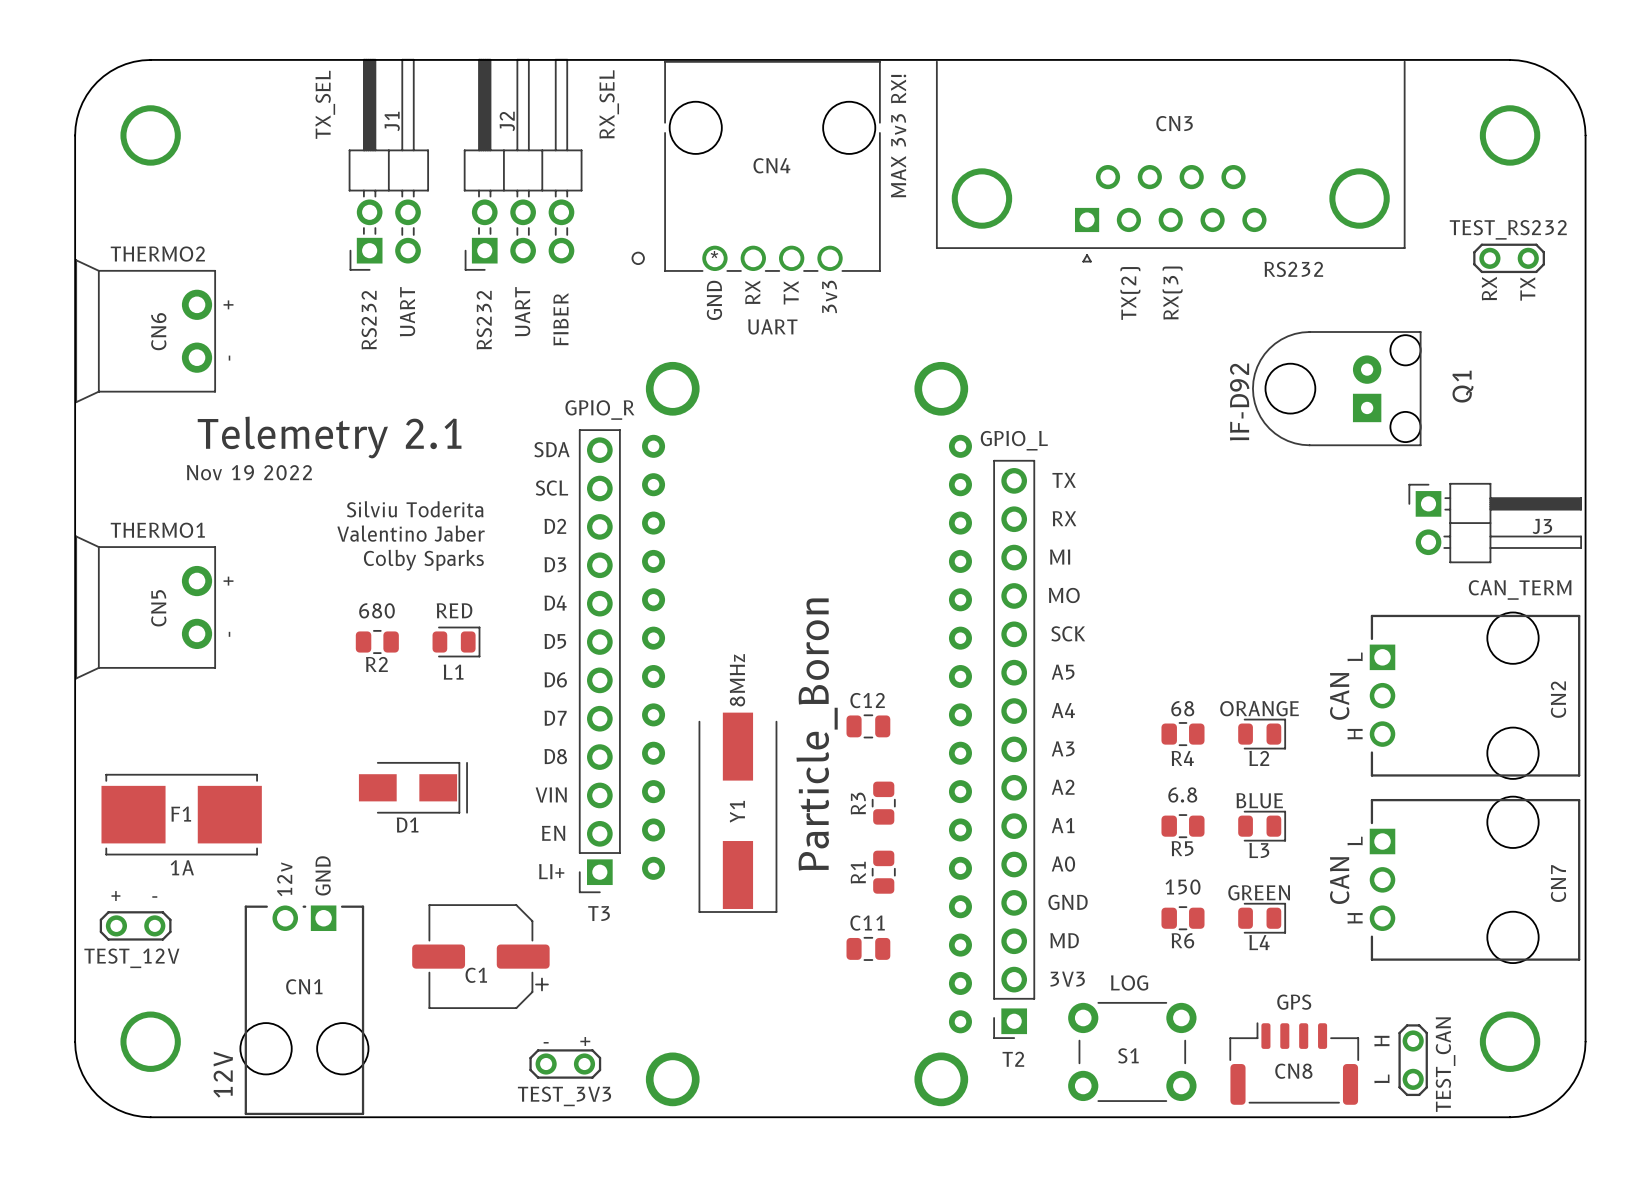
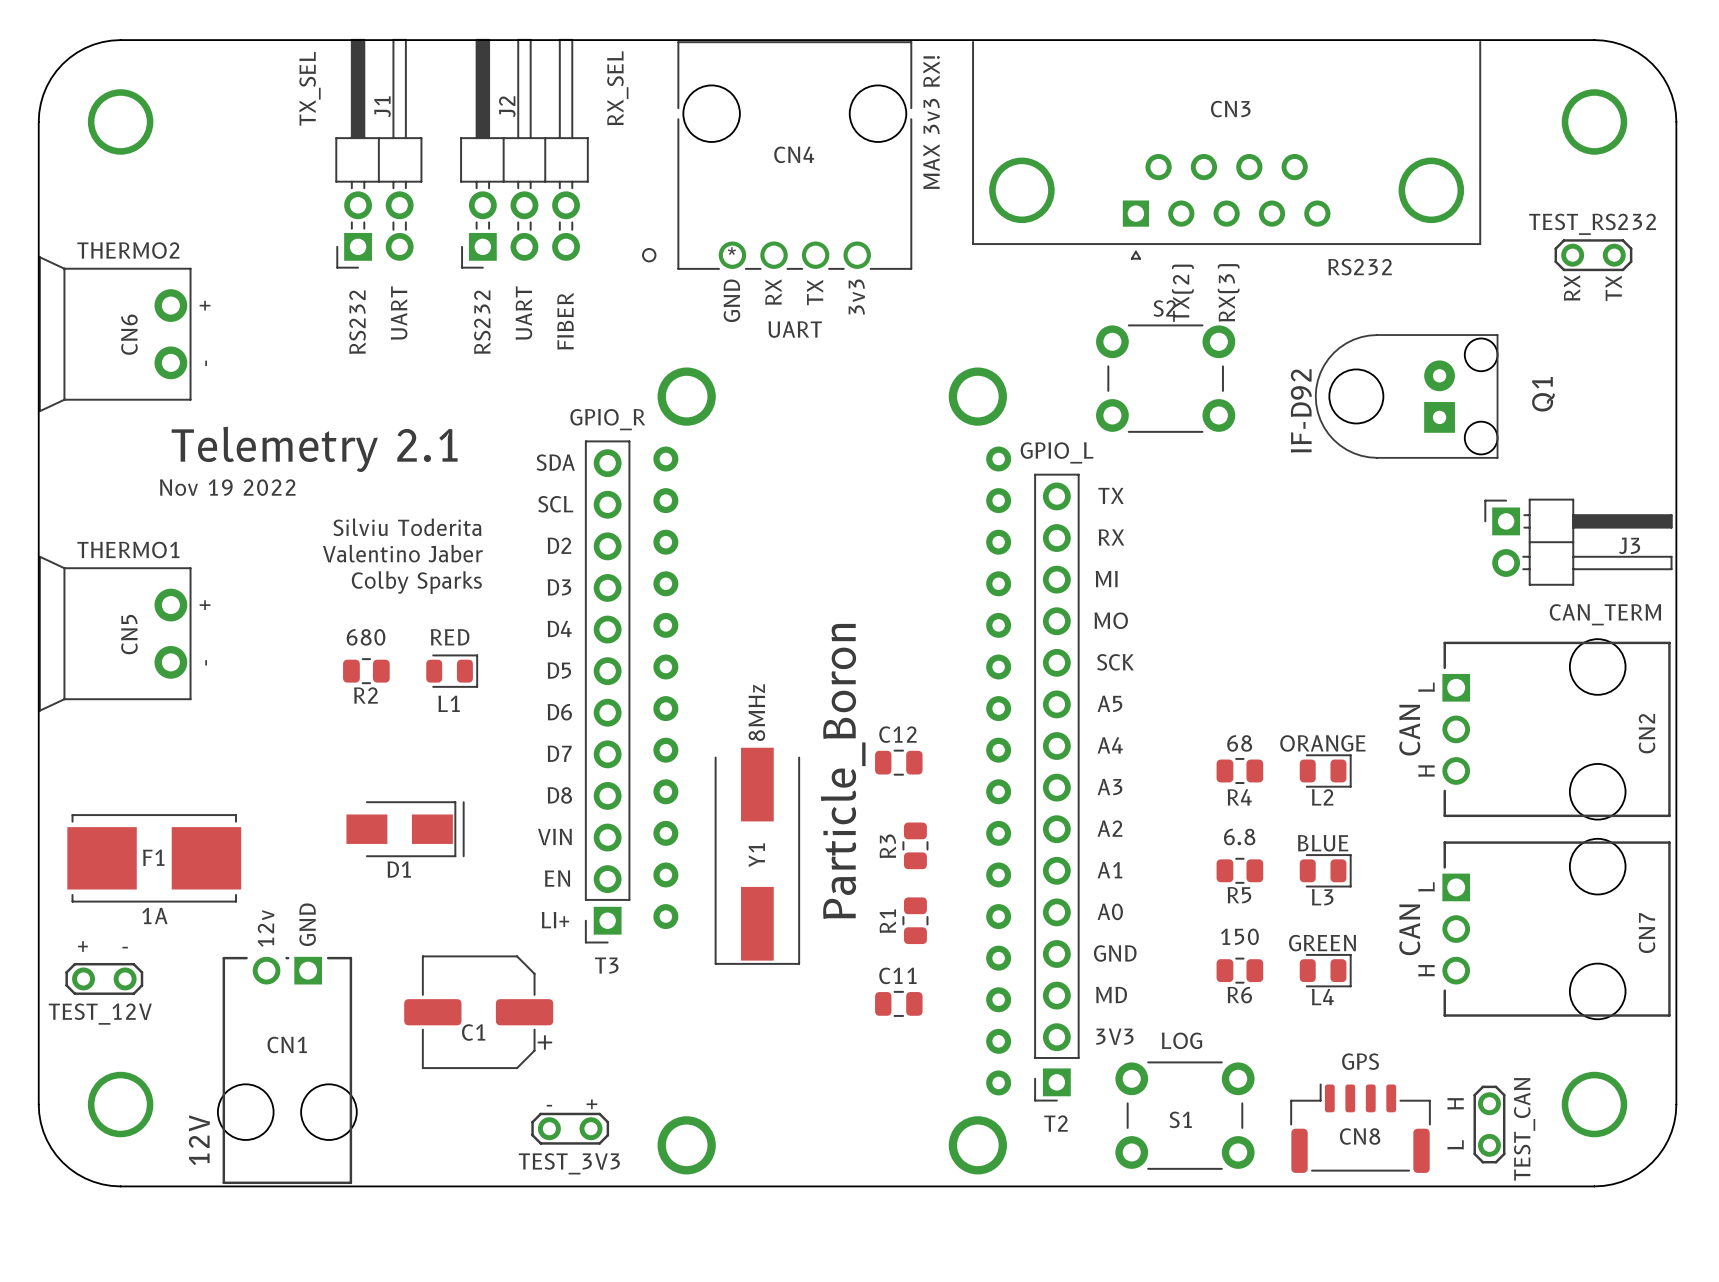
S2: none -> (1165, 378)

